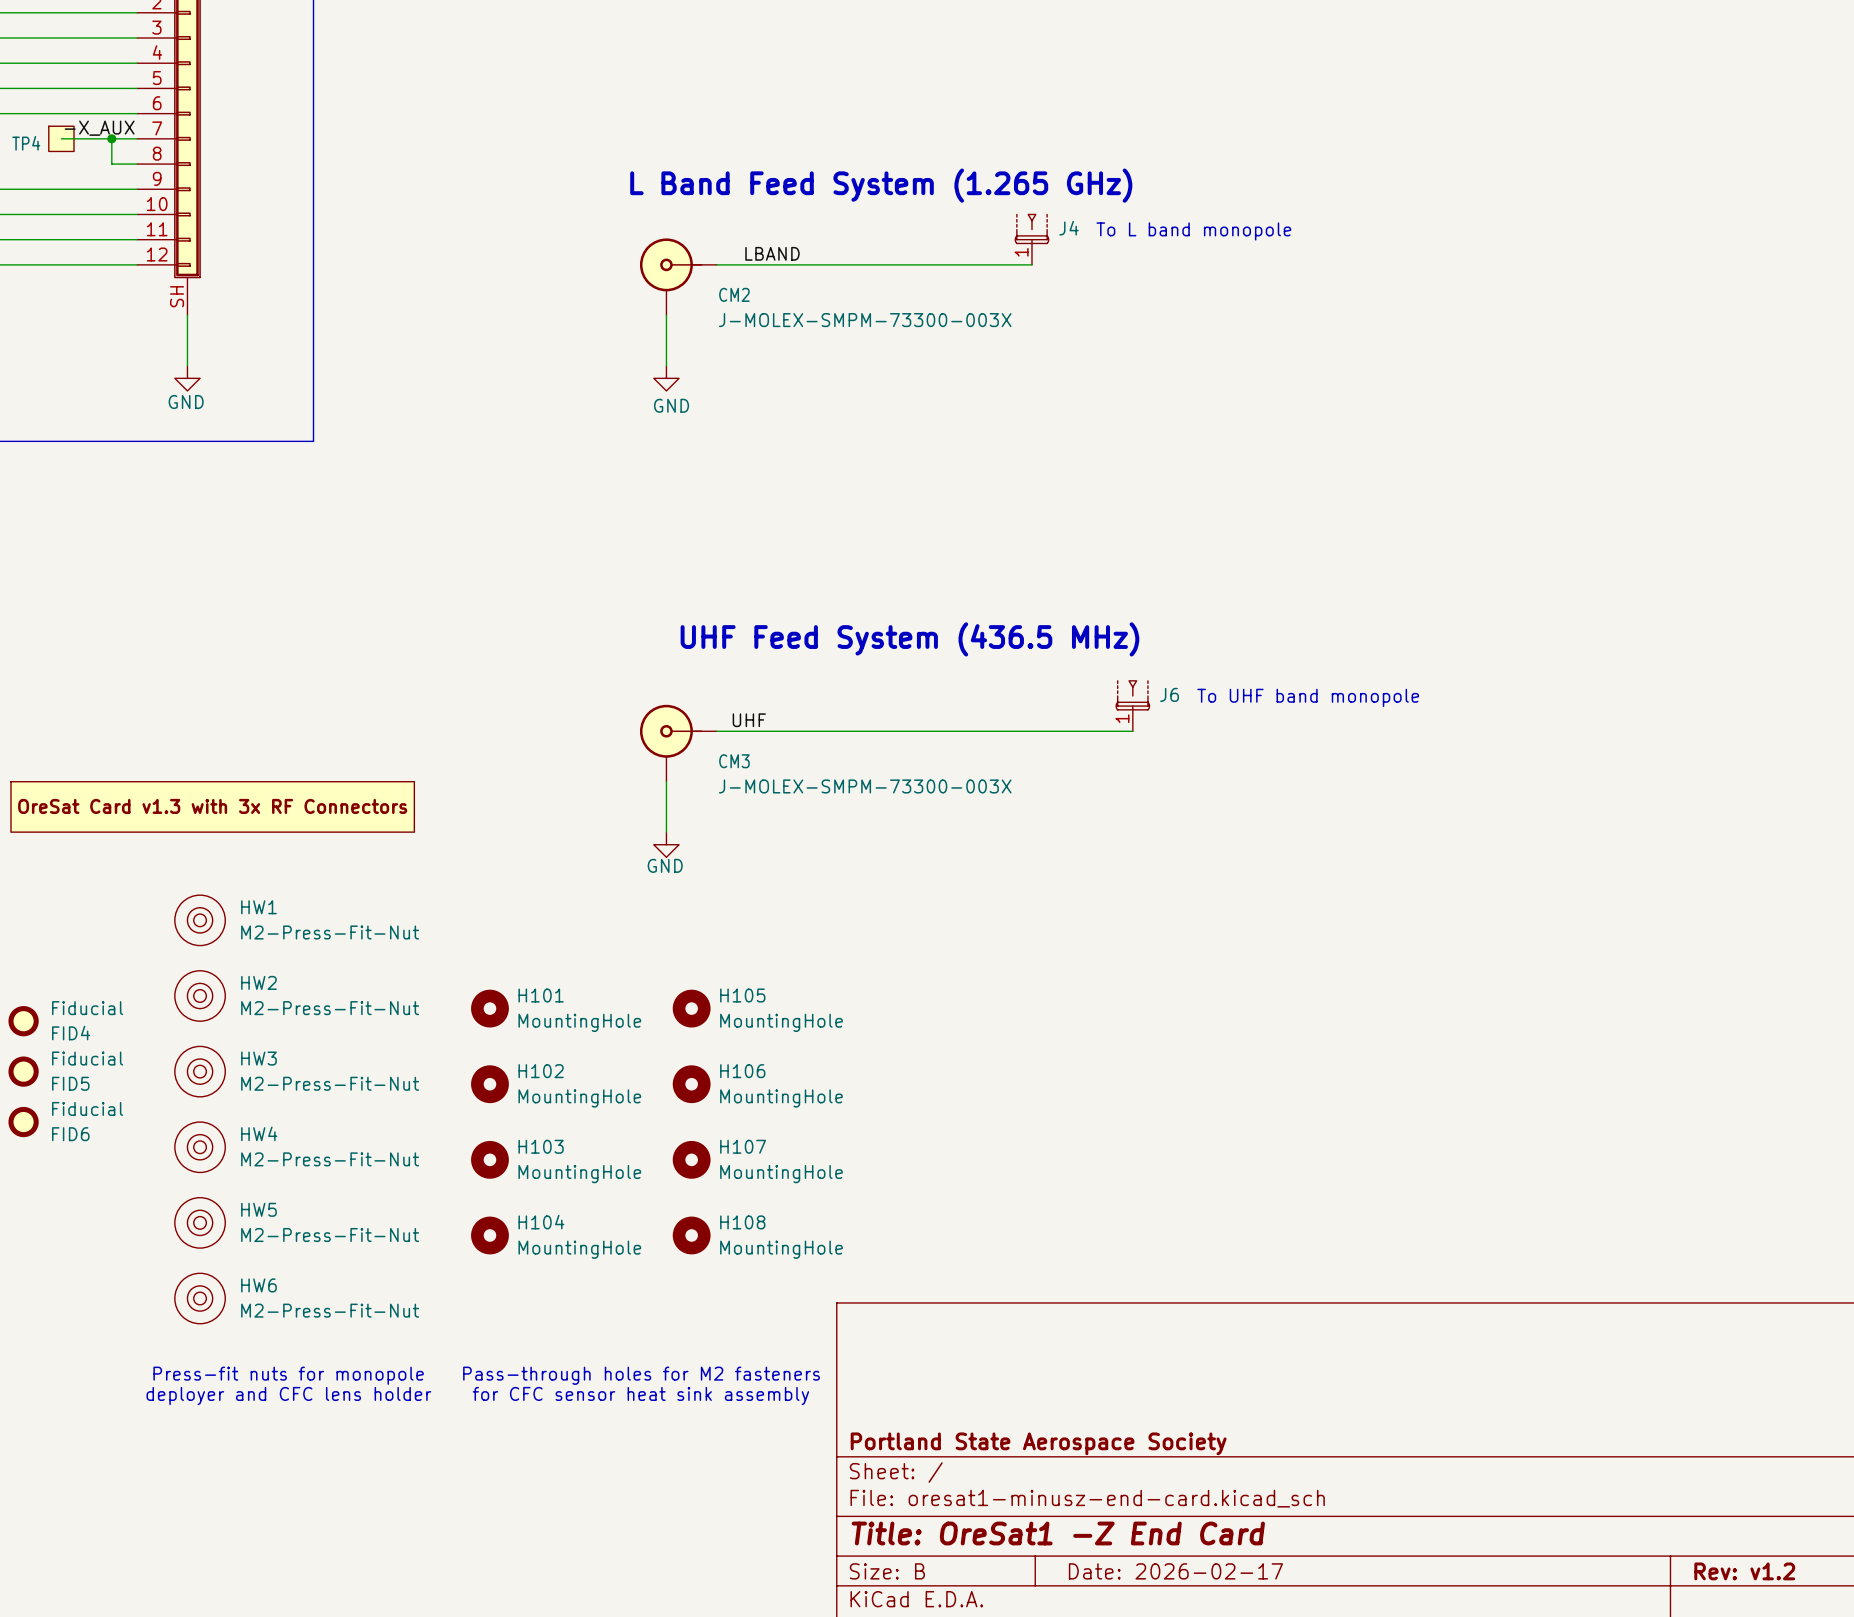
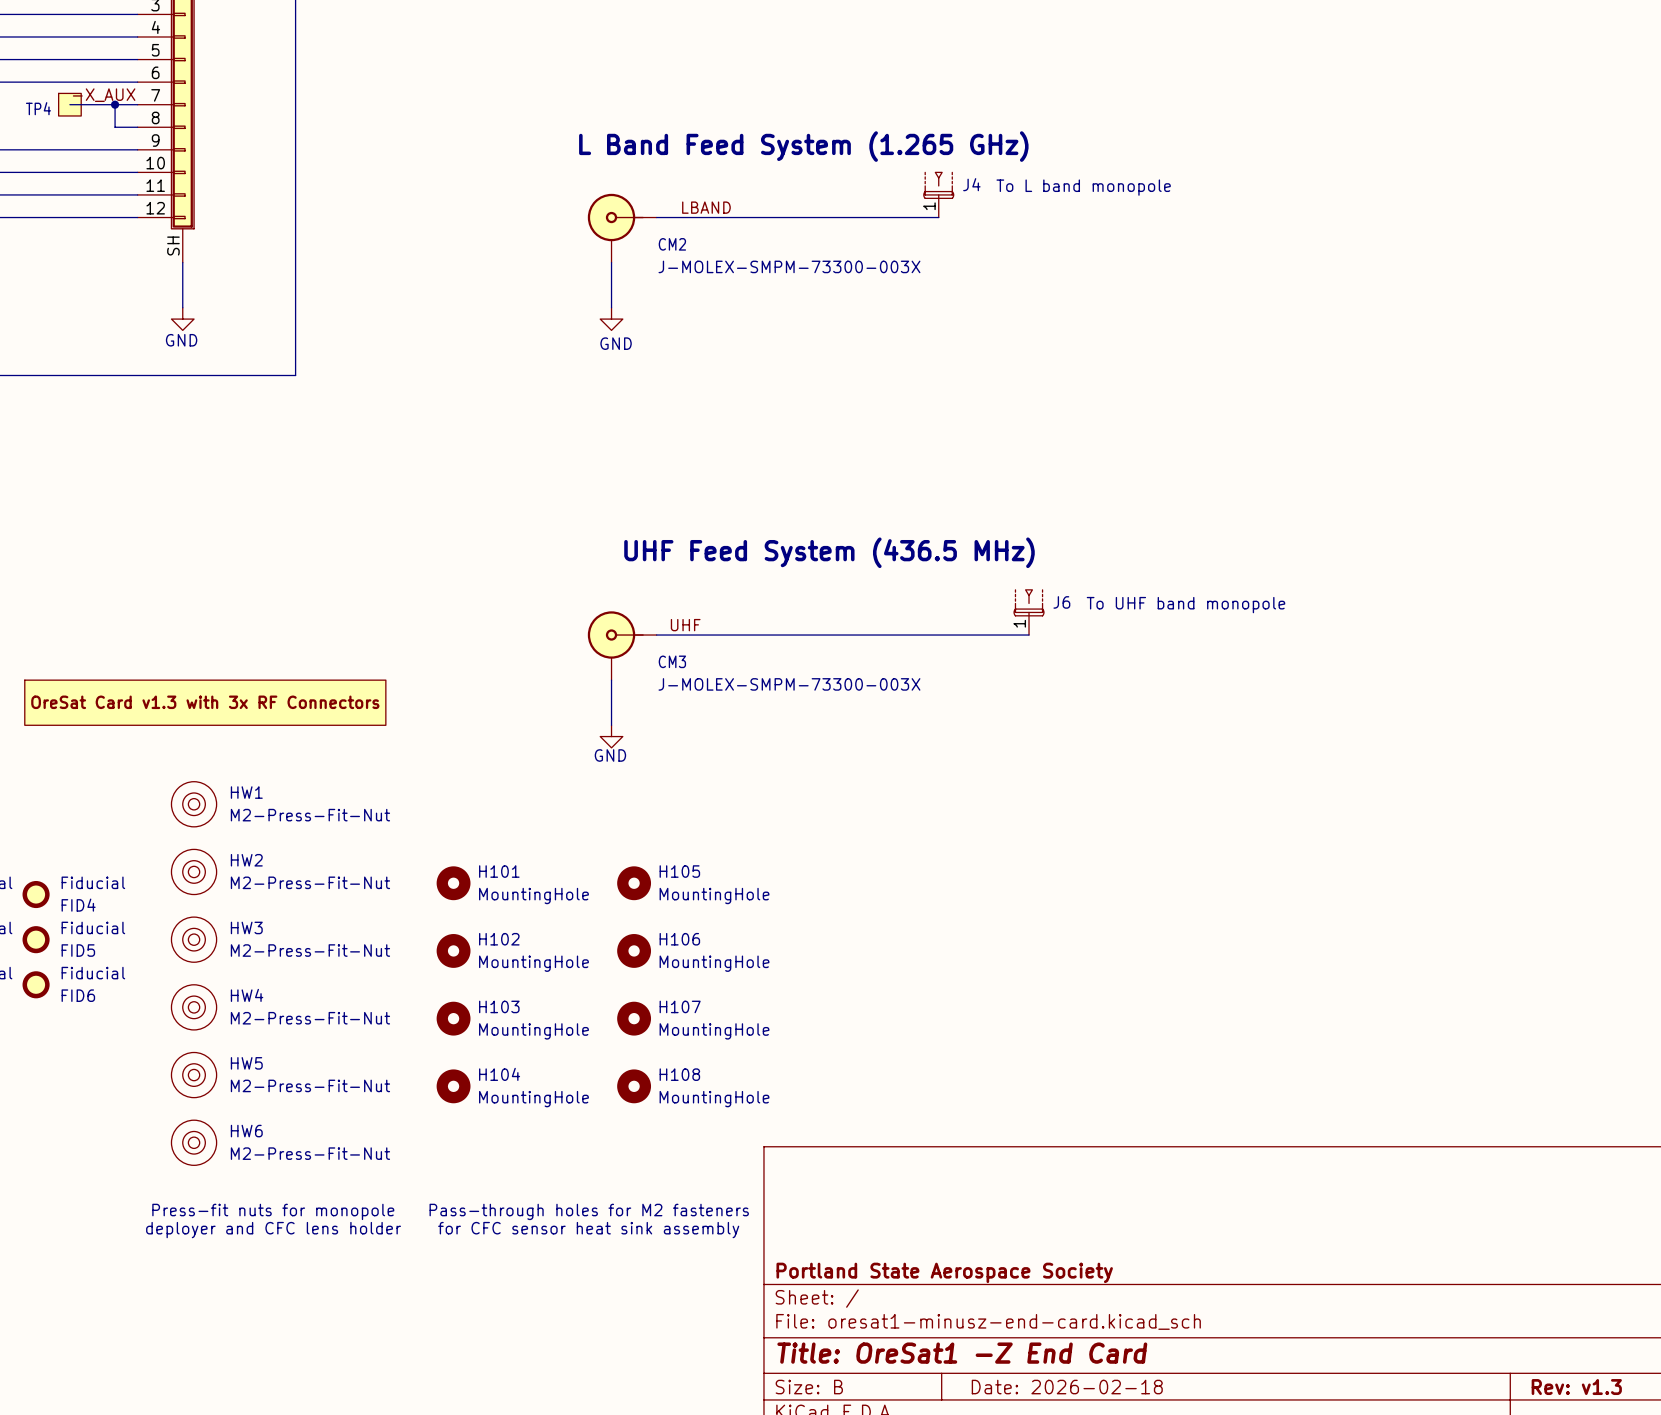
title block: Date: 2026-02-17 (1175, 1571) -> Date: 2026-02-18 (1067, 1387)
title block: Rev: v1.2 (1744, 1571) -> Rev: v1.3 (1576, 1387)

